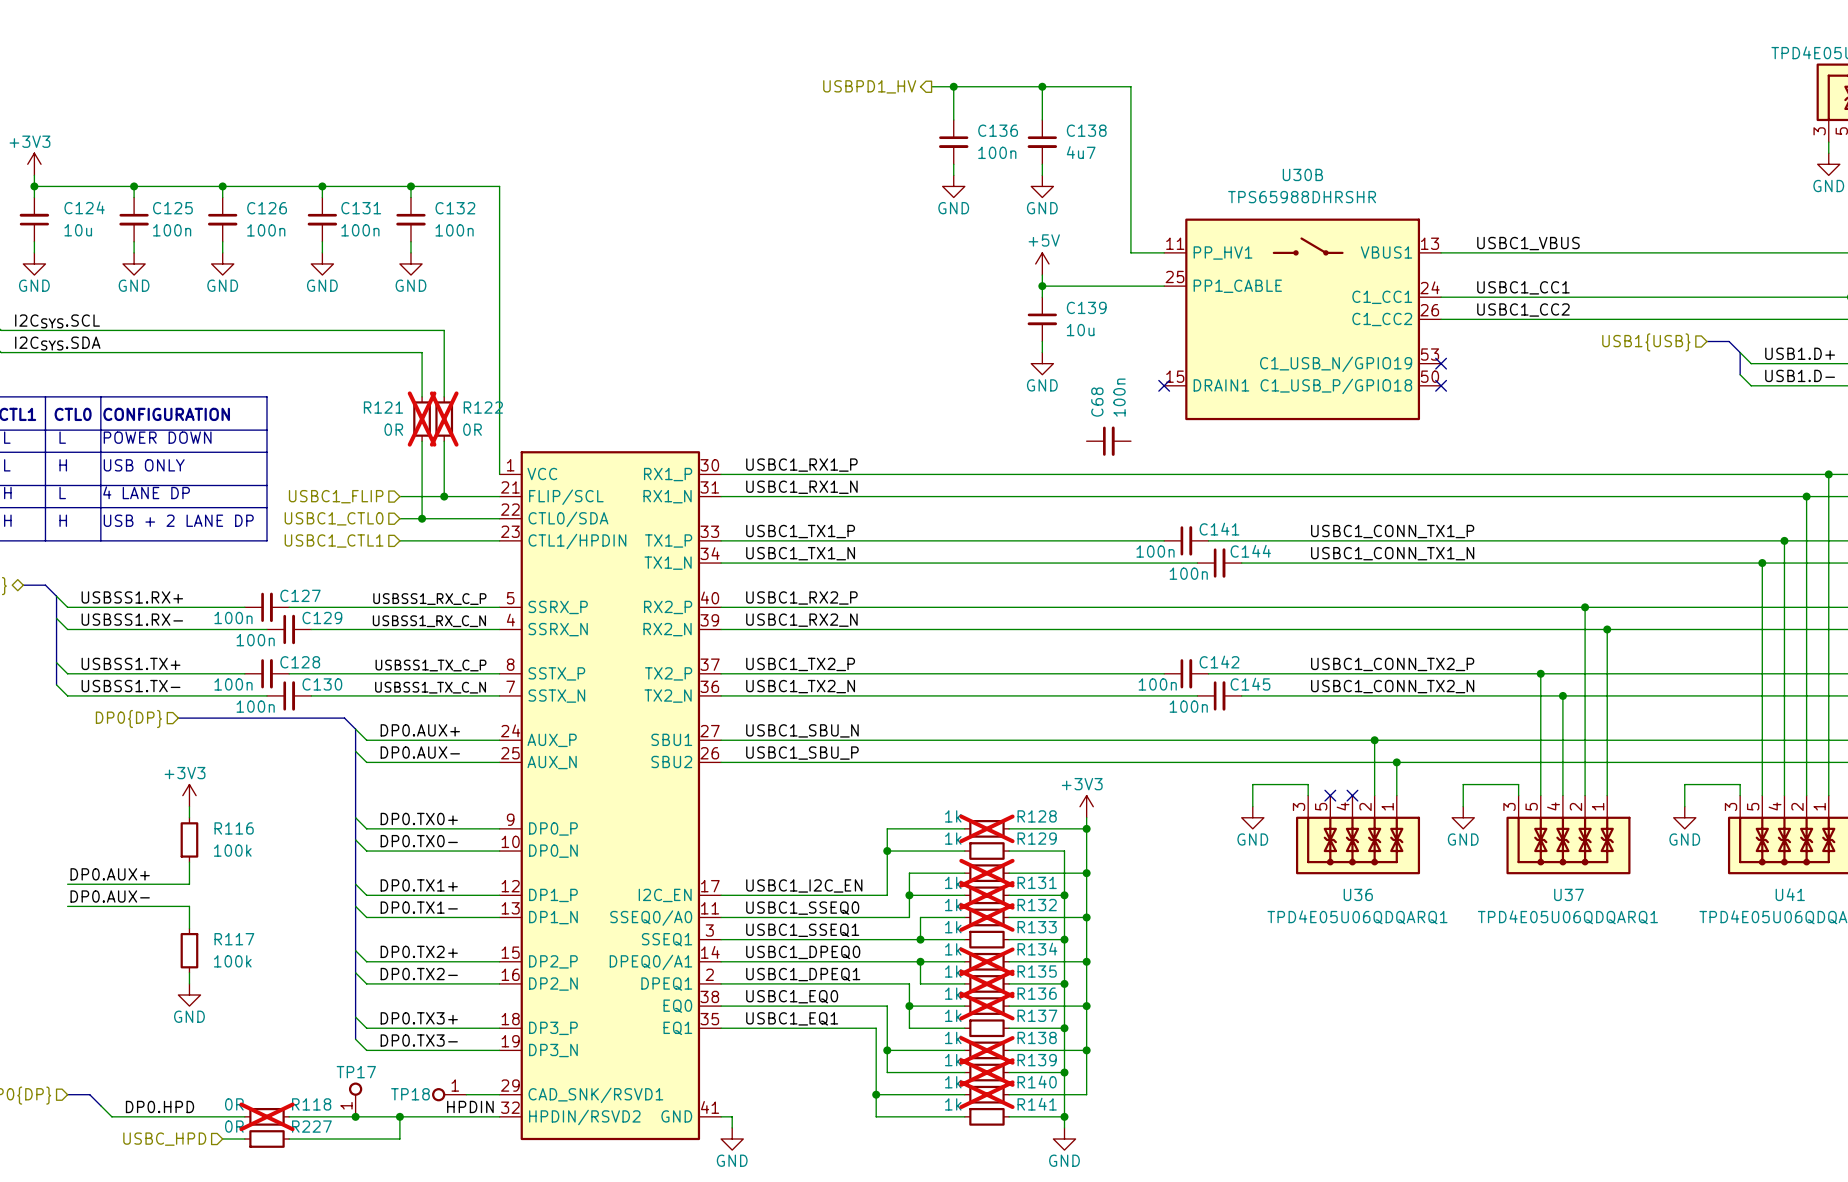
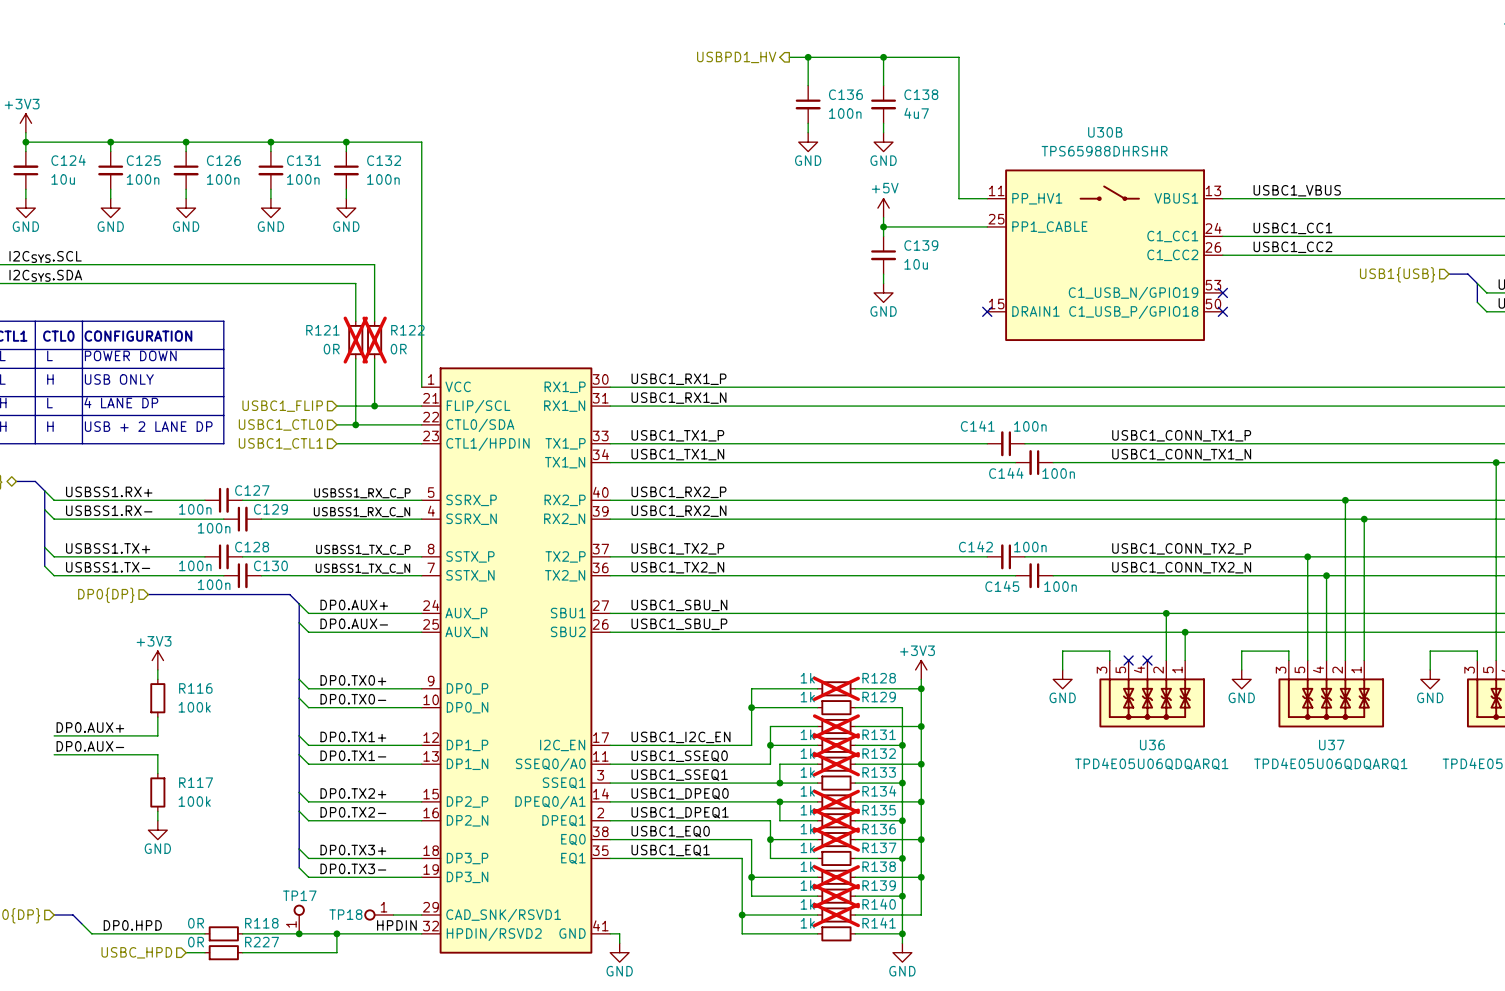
C68: (1108, 441) -> none
C141 name position: C141 (1219, 529) -> C141 (977, 426)
C141 rotation: 0° (1186, 540) -> 180° (1006, 443)
C144 rotation: 0° (1219, 563) -> 180° (1034, 462)
C144 text position: 100n (1188, 573) -> 100n (1058, 473)
C142 name position: C142 (1219, 662) -> C142 (975, 546)
C142 rotation: 0° (1186, 673) -> 180° (1006, 556)
C145 rotation: 0° (1219, 695) -> 180° (1034, 575)
C145 text position: 100n (1188, 706) -> 100n (1060, 586)
R118 do-not-place cross: (266, 1116) -> none

